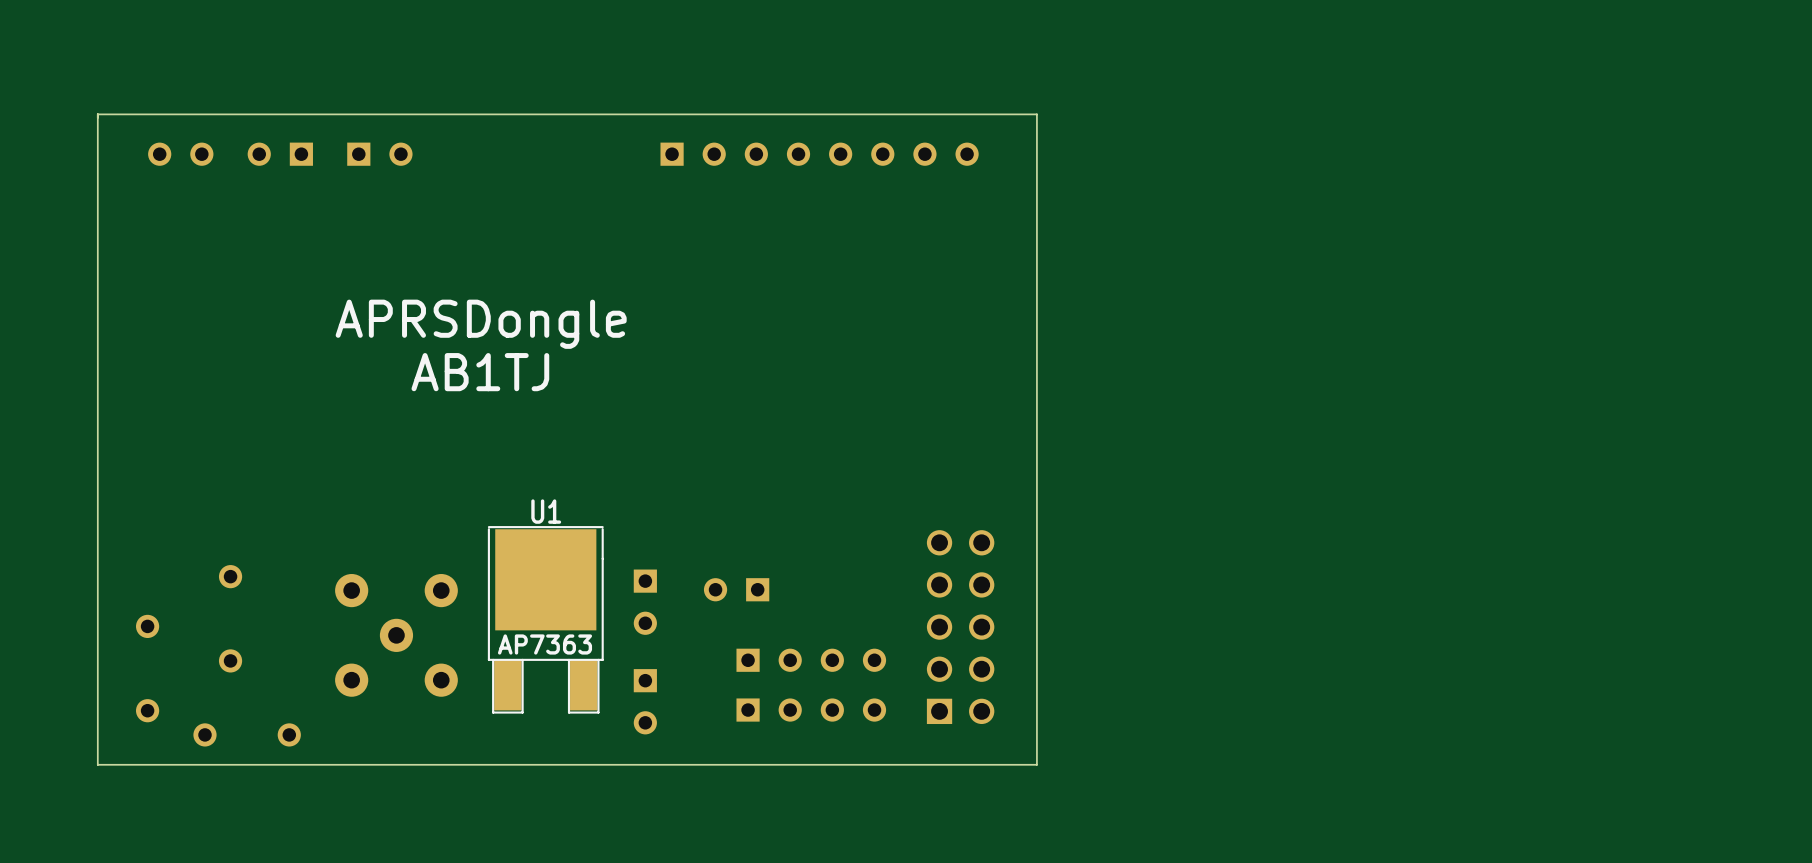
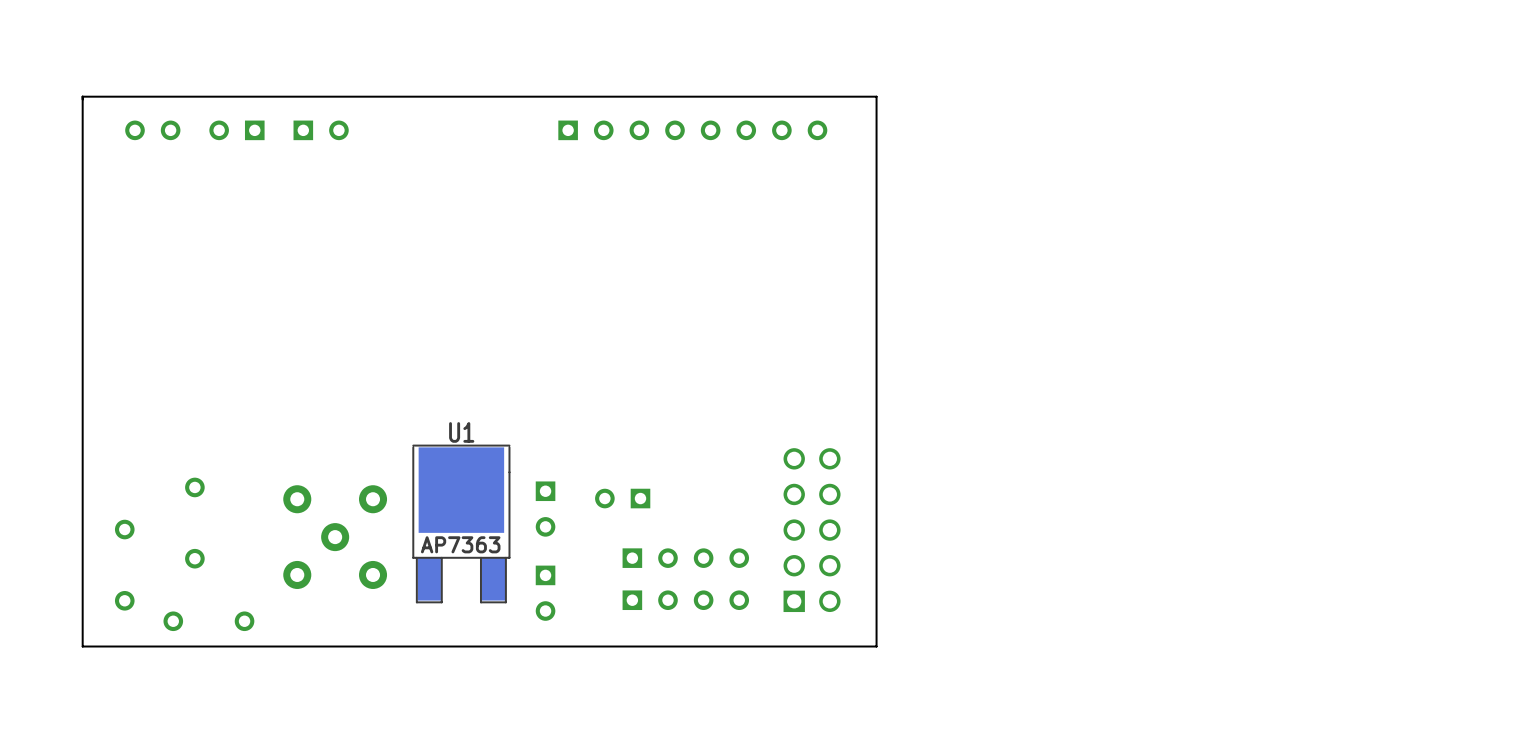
text: APRSDongle (481, 324) -> none
text: AB1TJ (480, 372) -> none

